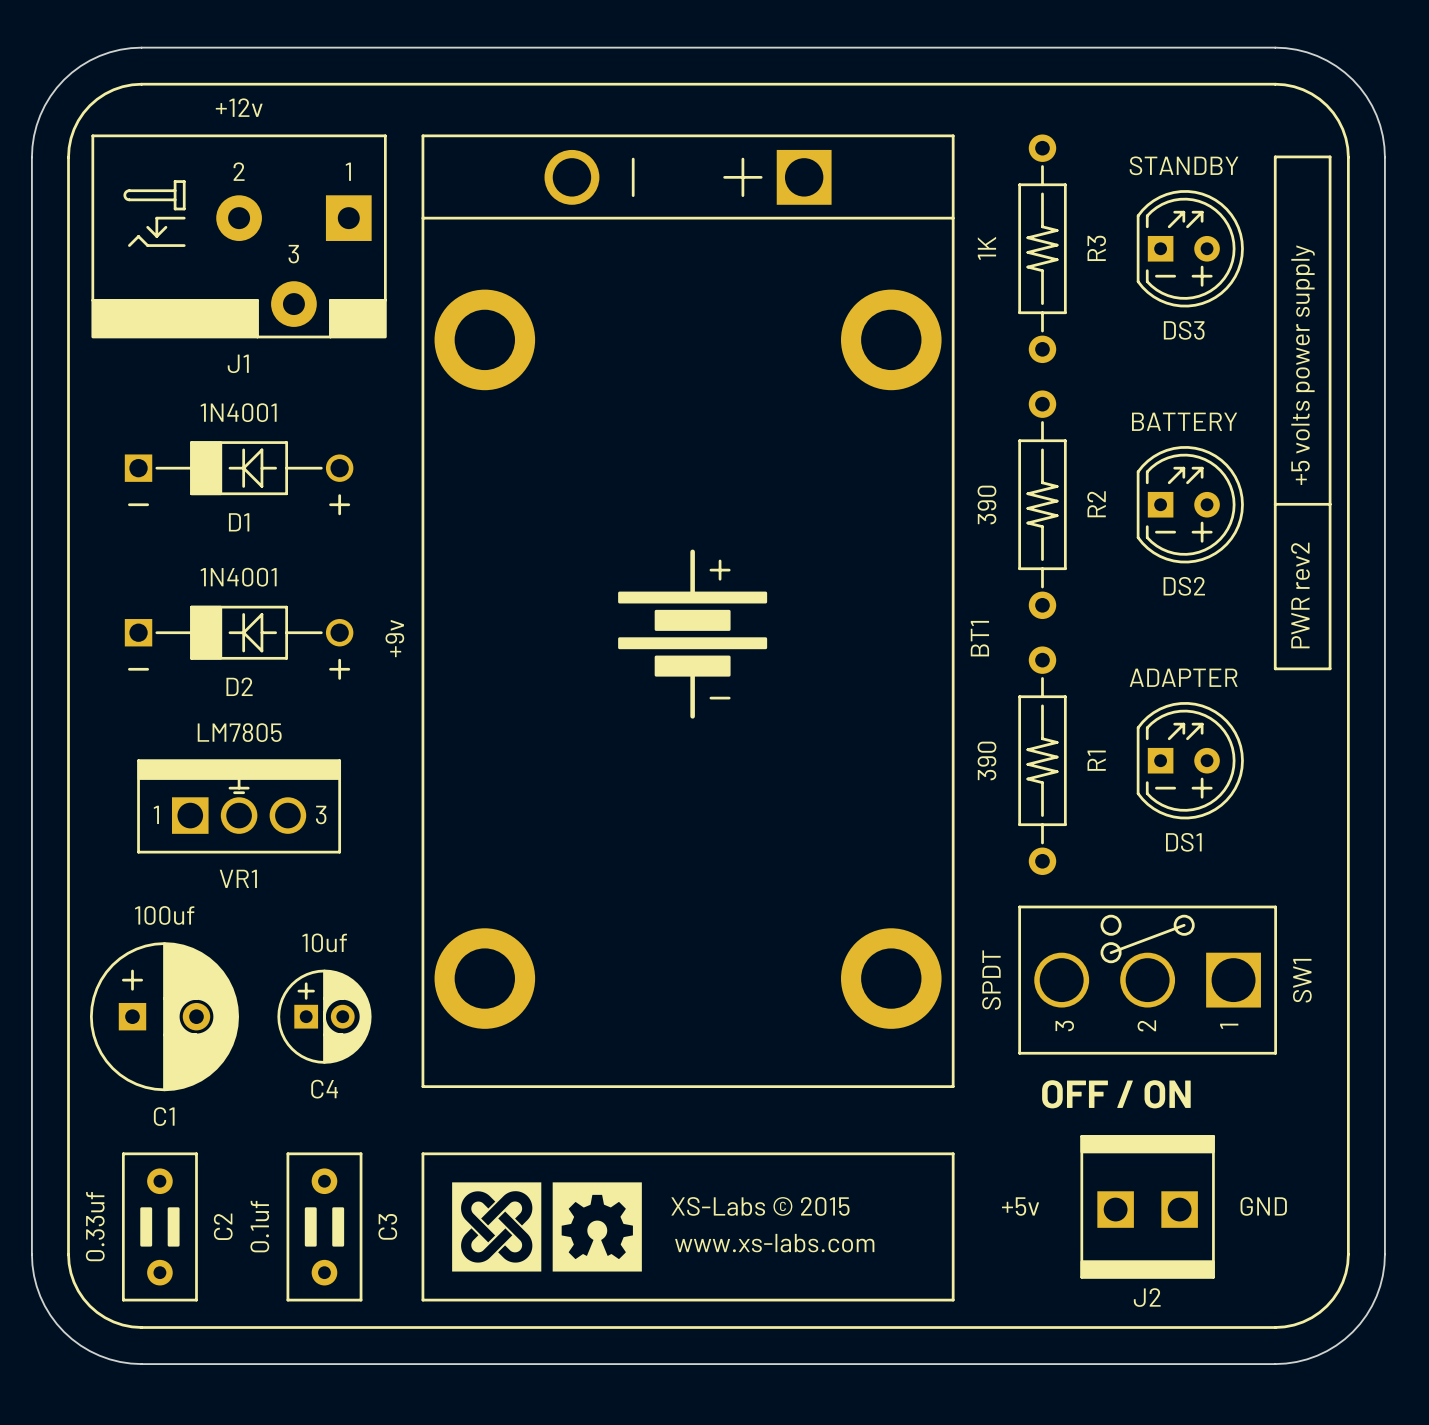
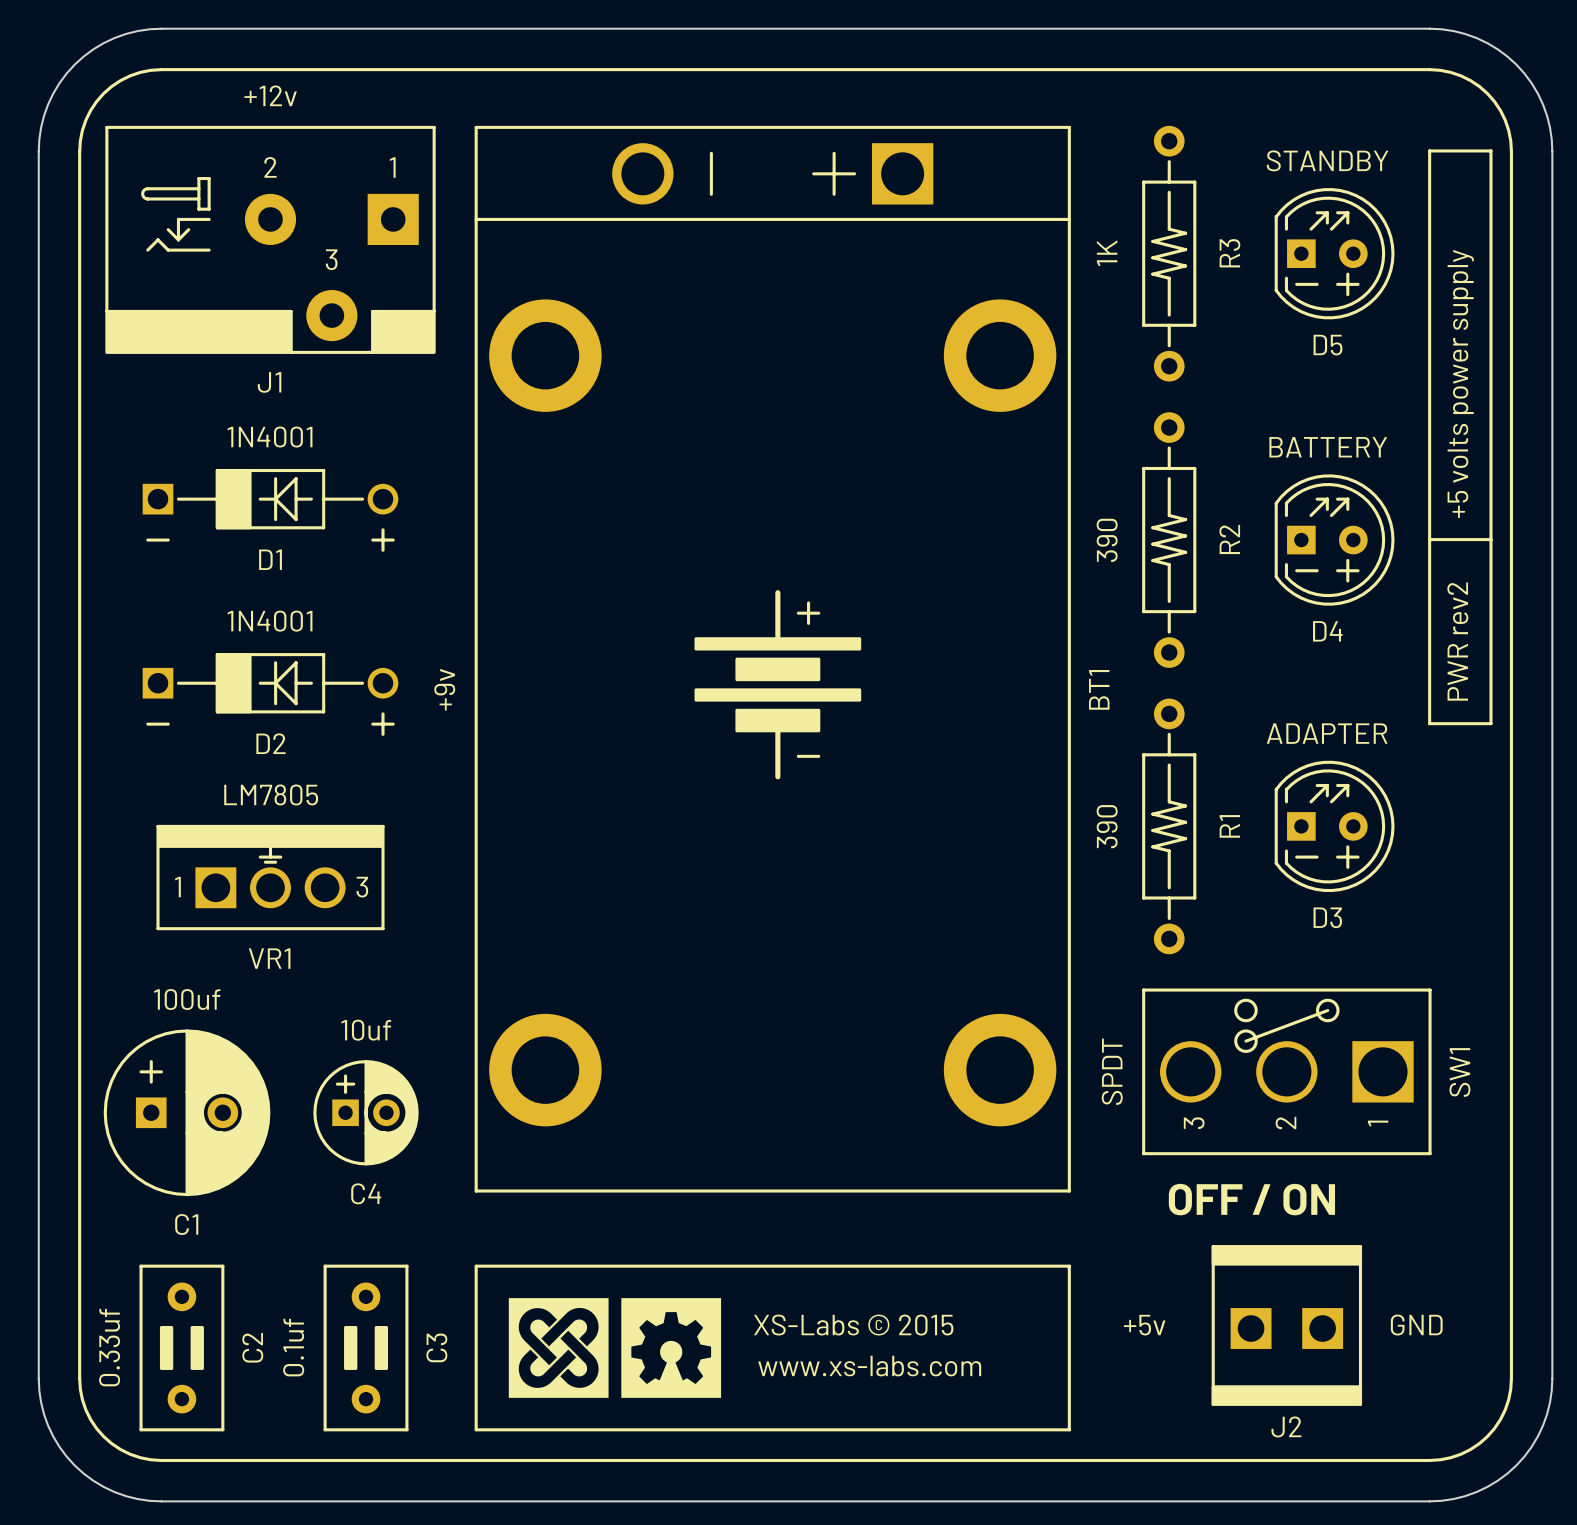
DS3 name: DS3 (1184, 330) -> D5 (1328, 345)
DS2 name: DS2 (1184, 586) -> D4 (1327, 631)
DS1 name: DS1 (1183, 842) -> D3 (1327, 917)

